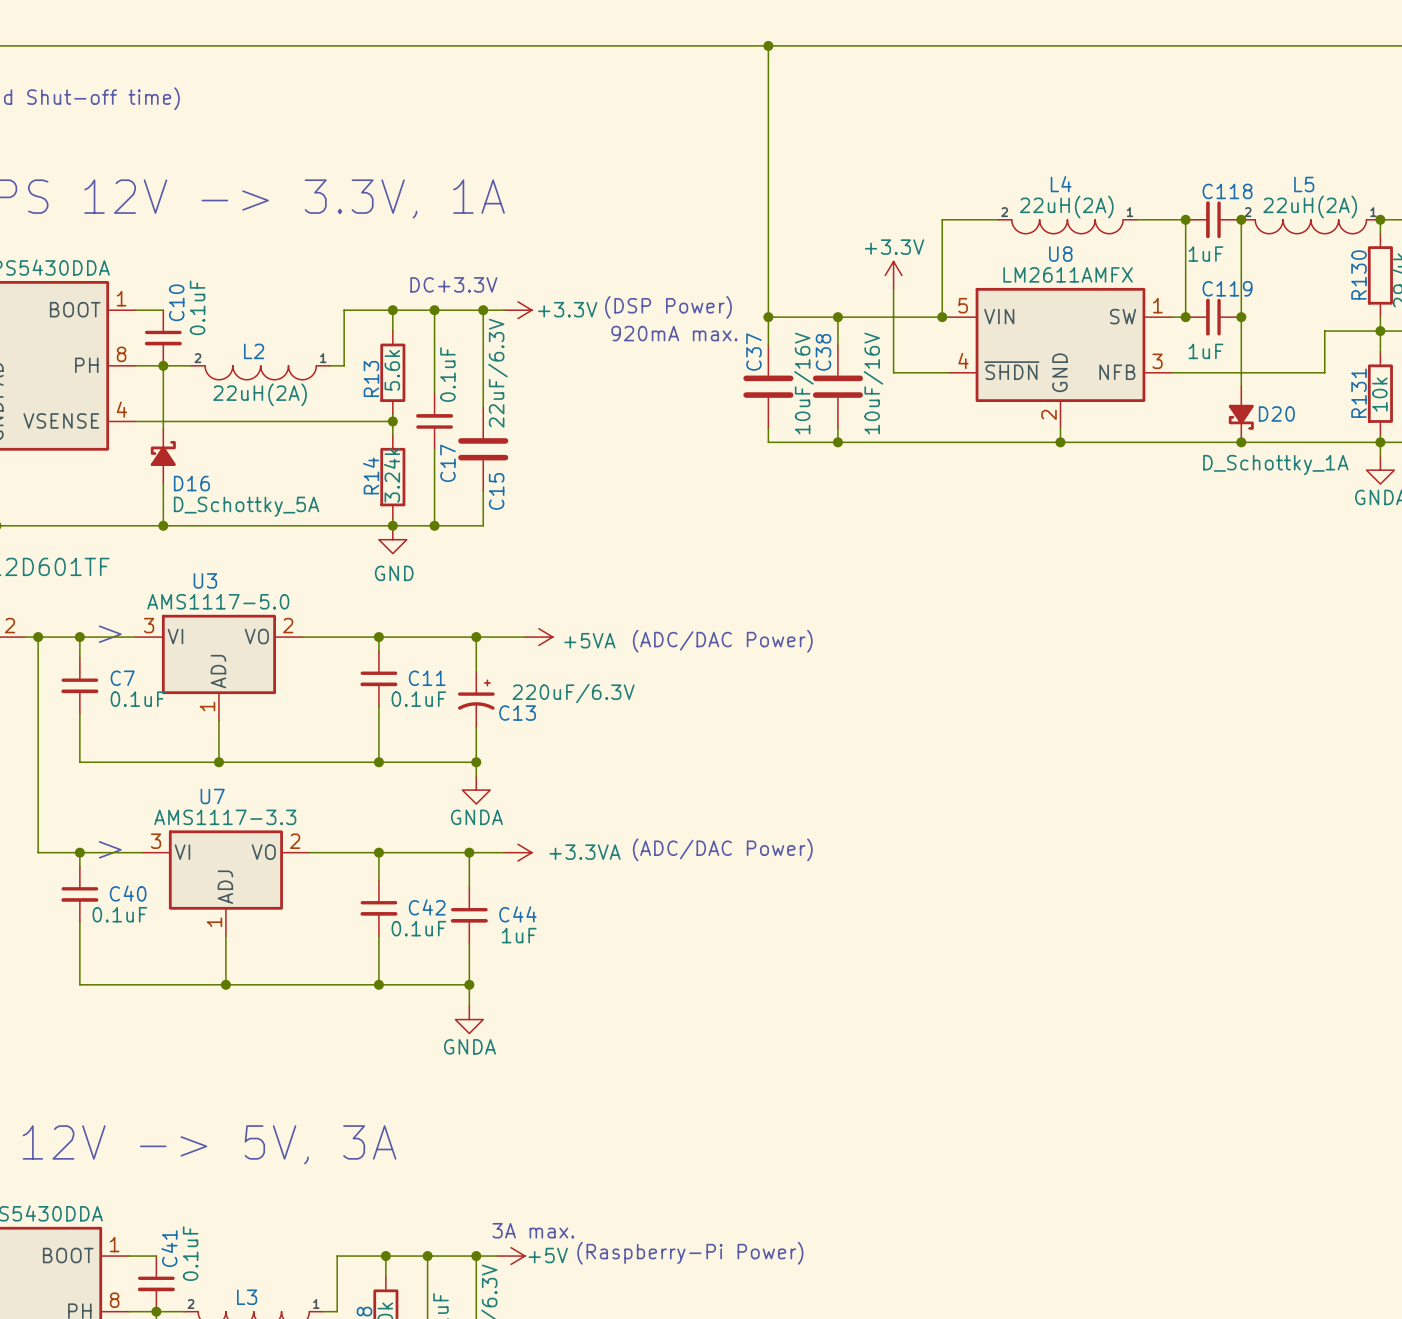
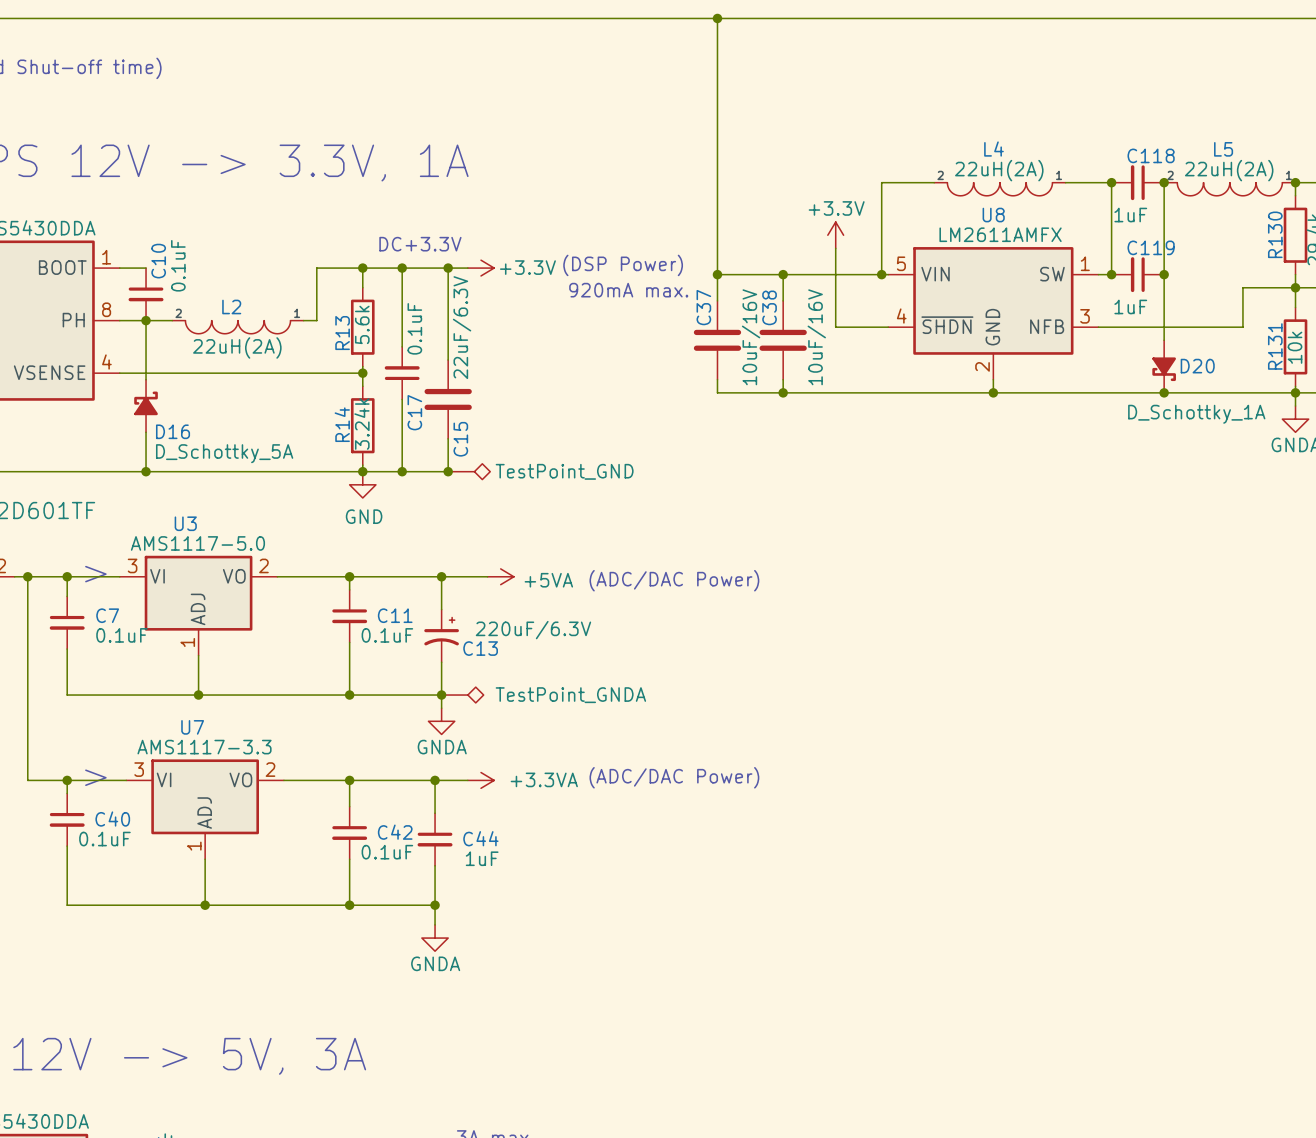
junction: none -> (448, 471)
part: none -> TestPoint_GND (469, 471)
part: none -> TestPoint_GNDA (462, 695)

